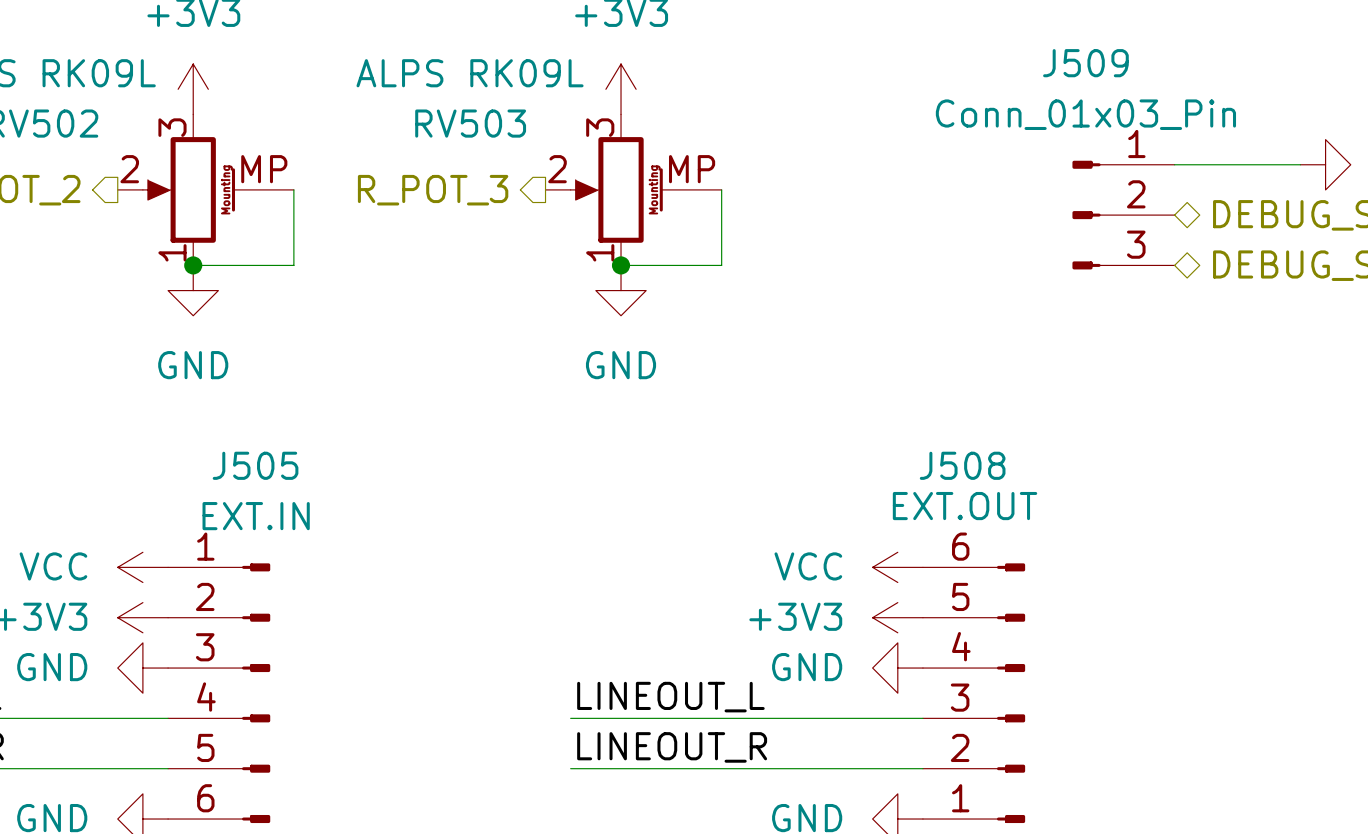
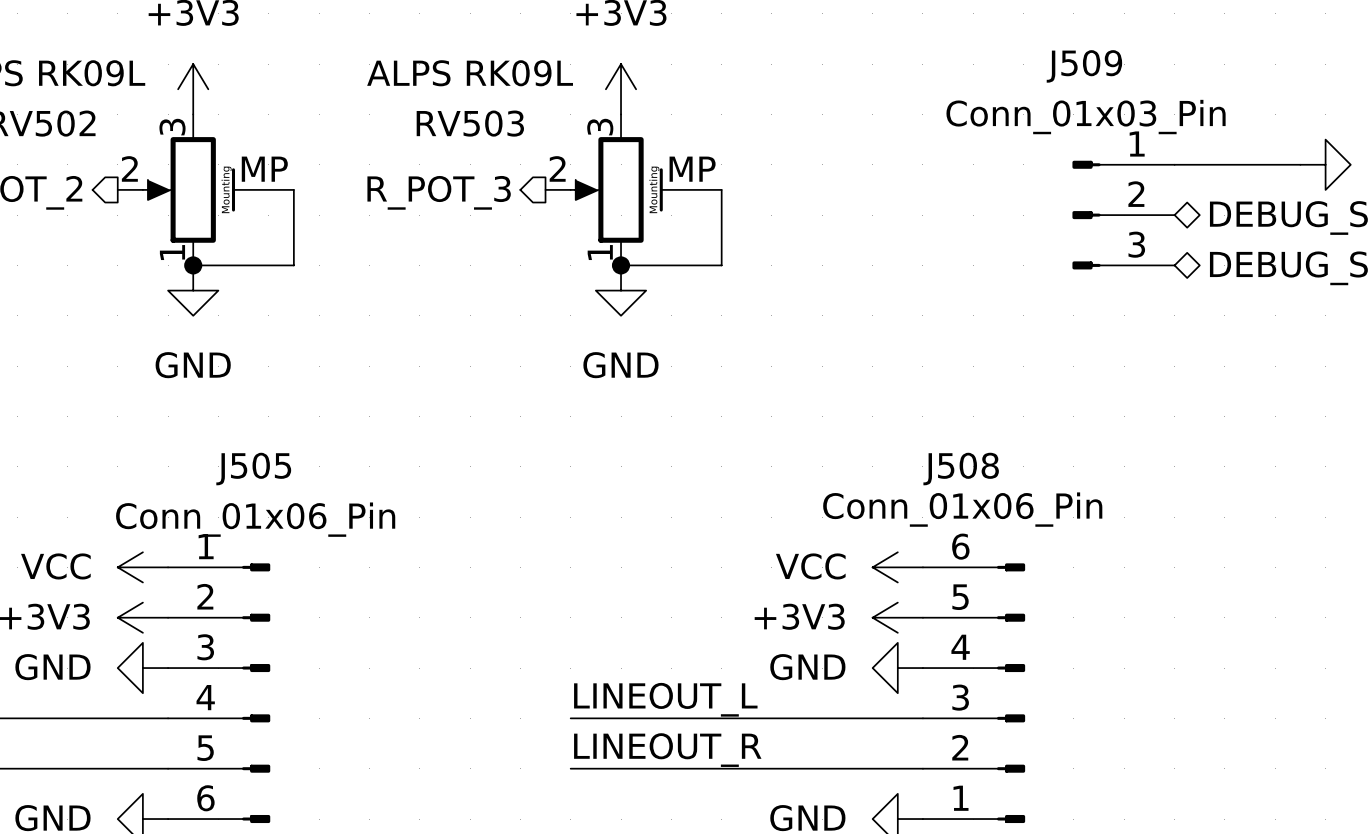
J508 value: EXT.OUT (965, 506) -> Conn_01x06_Pin (962, 509)
J505 value: EXT.IN (256, 516) -> Conn_01x06_Pin (255, 519)

